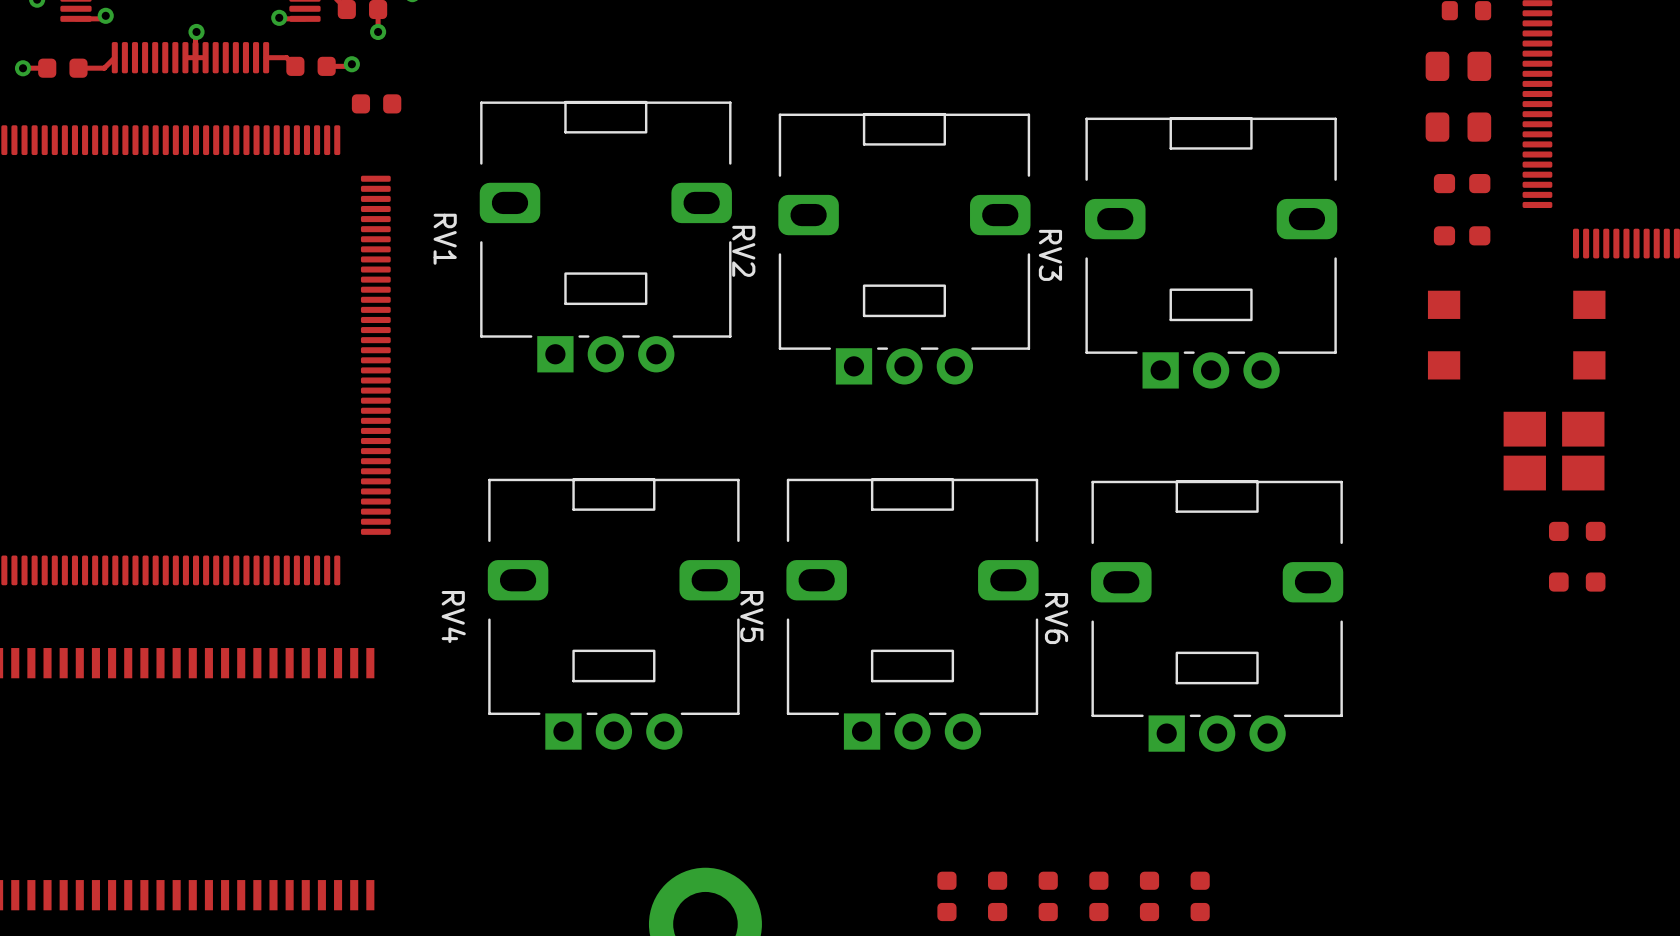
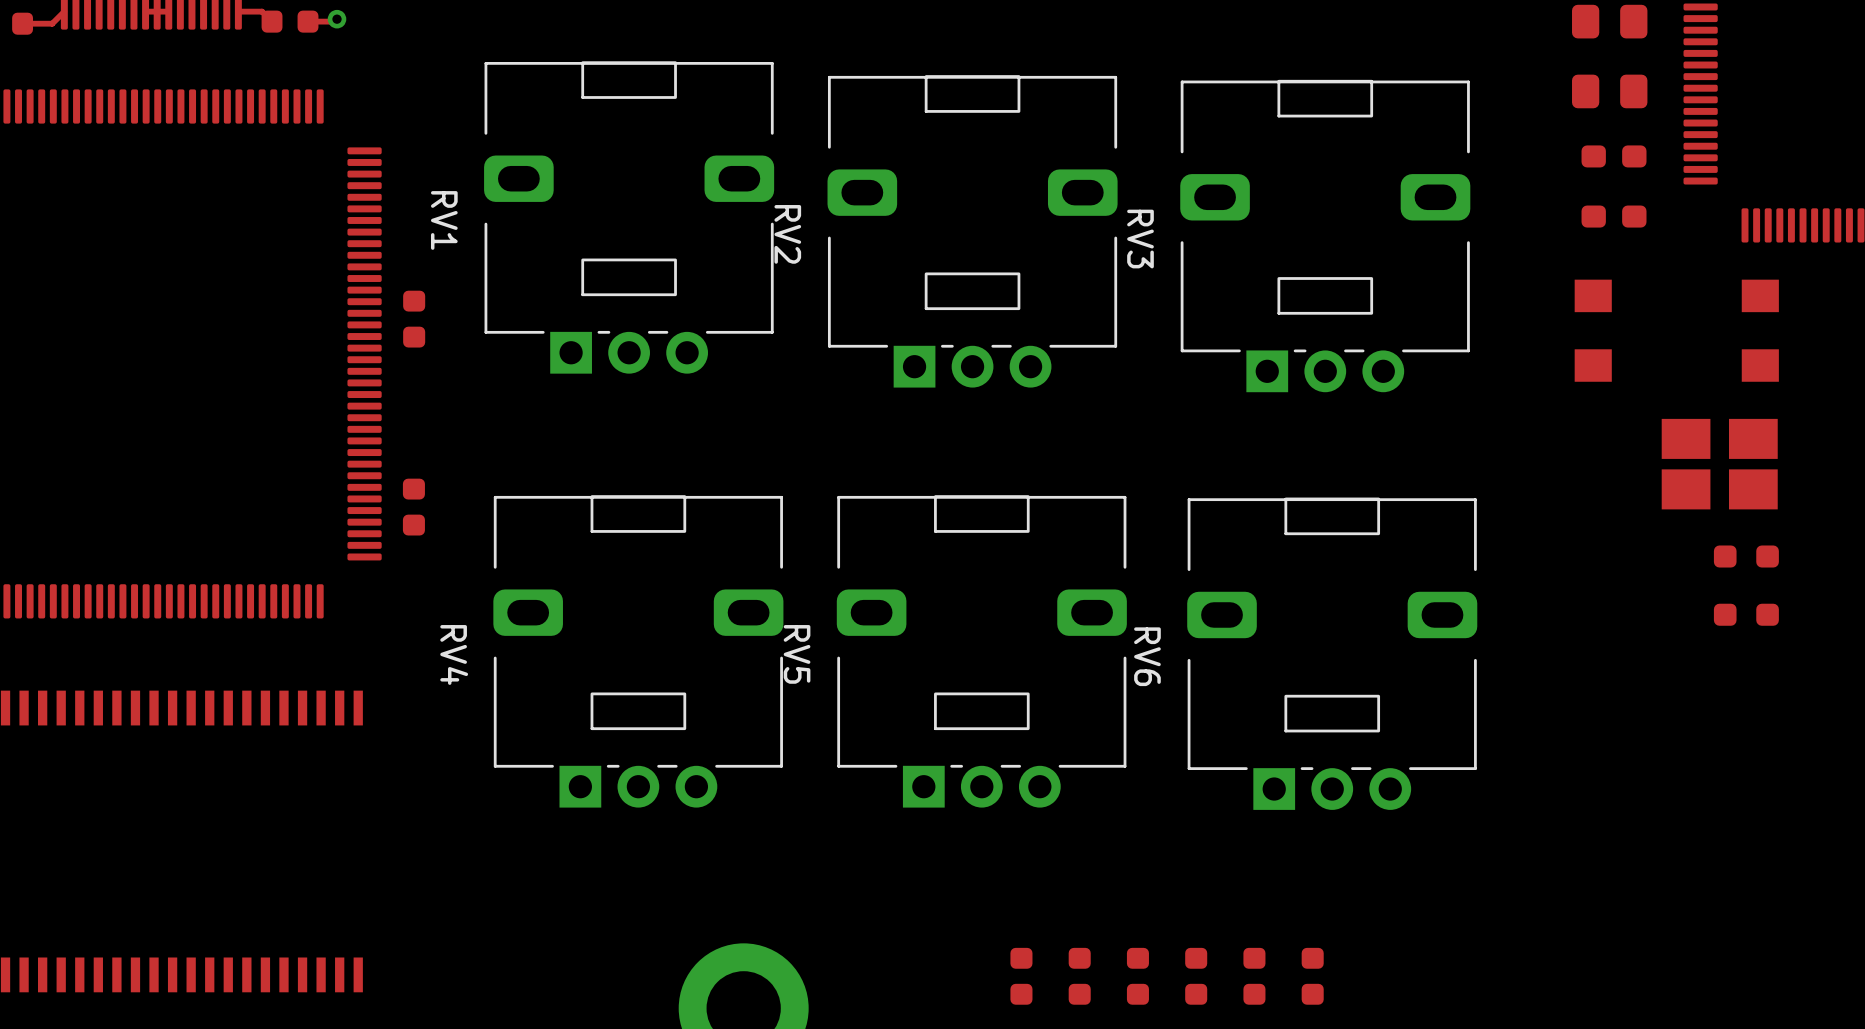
part: (376, 103) -> none
part: none -> (414, 319)
part: none -> (413, 507)

